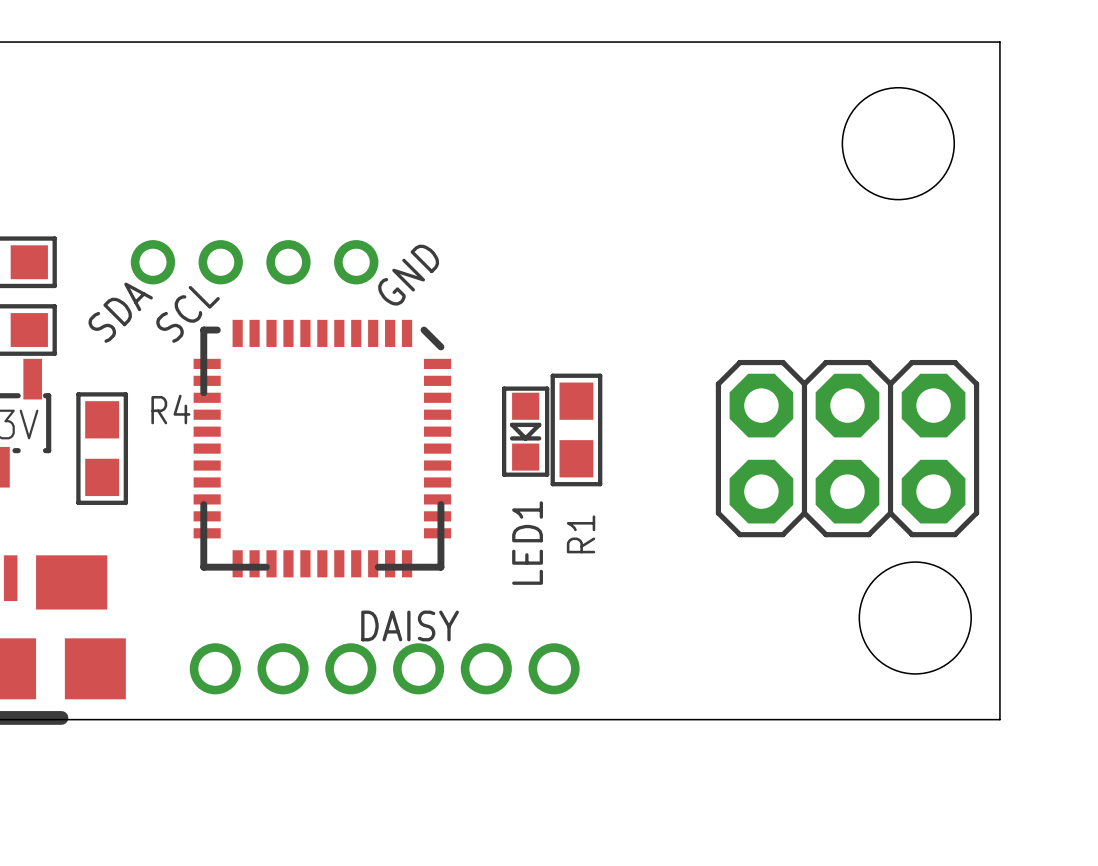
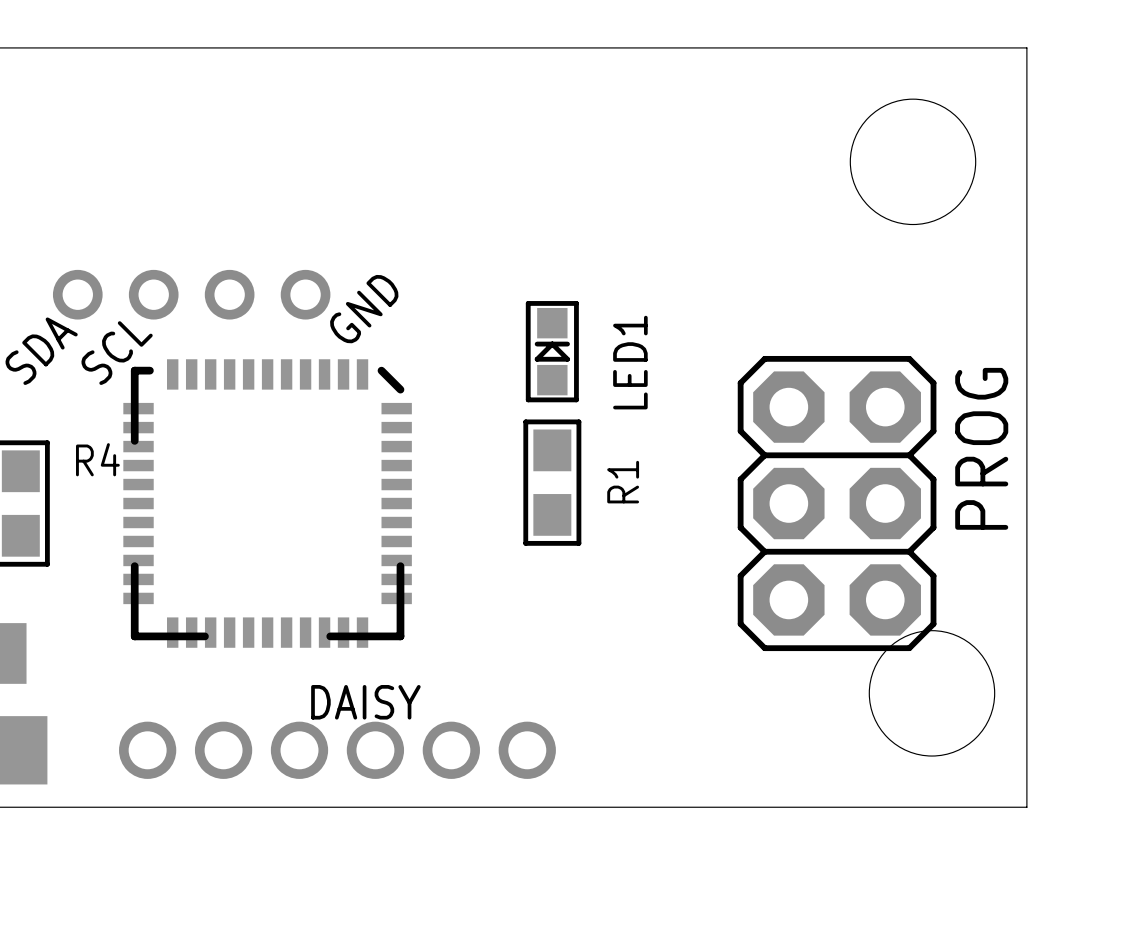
LED1 rotation: 0° (525, 431) -> 180° (552, 351)
LED1 position: (525, 431) -> (552, 351)
PROG: none -> (837, 503)
part: (847, 448) -> none
R1 name position: R1 (581, 534) -> R1 (623, 482)
LED1 name position: LED1 (527, 543) -> LED1 (630, 362)

